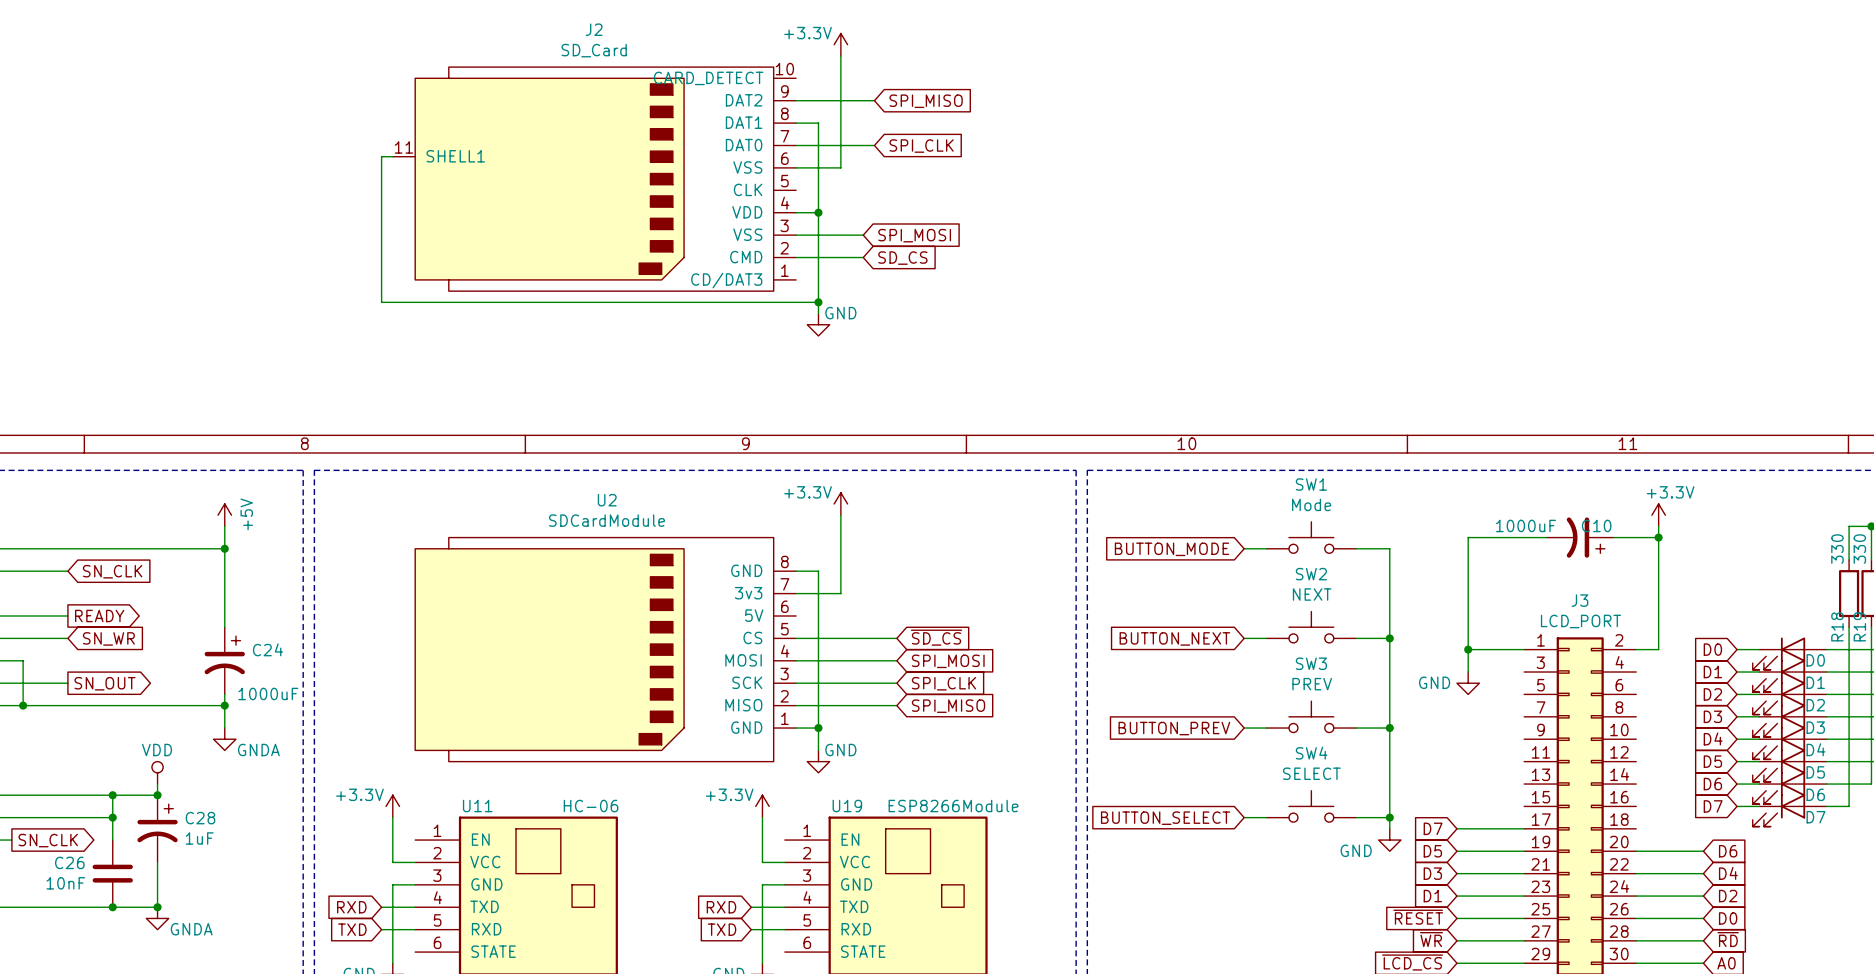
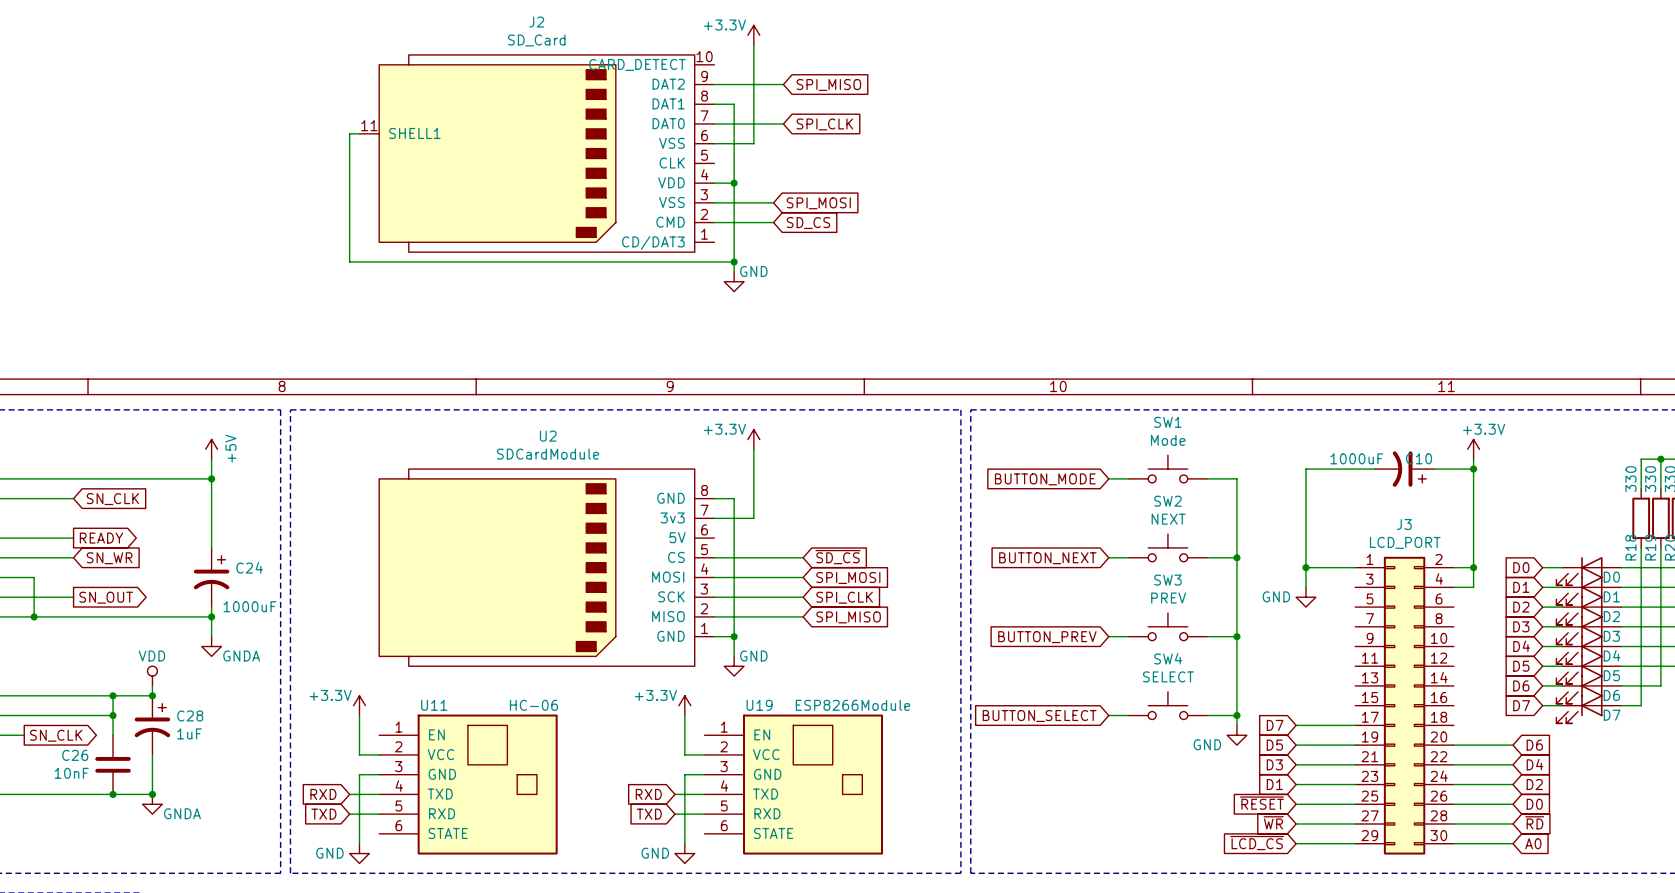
wire: none -> (1473, 567) (1473, 587) (1453, 587)
junction: none -> (1473, 567)

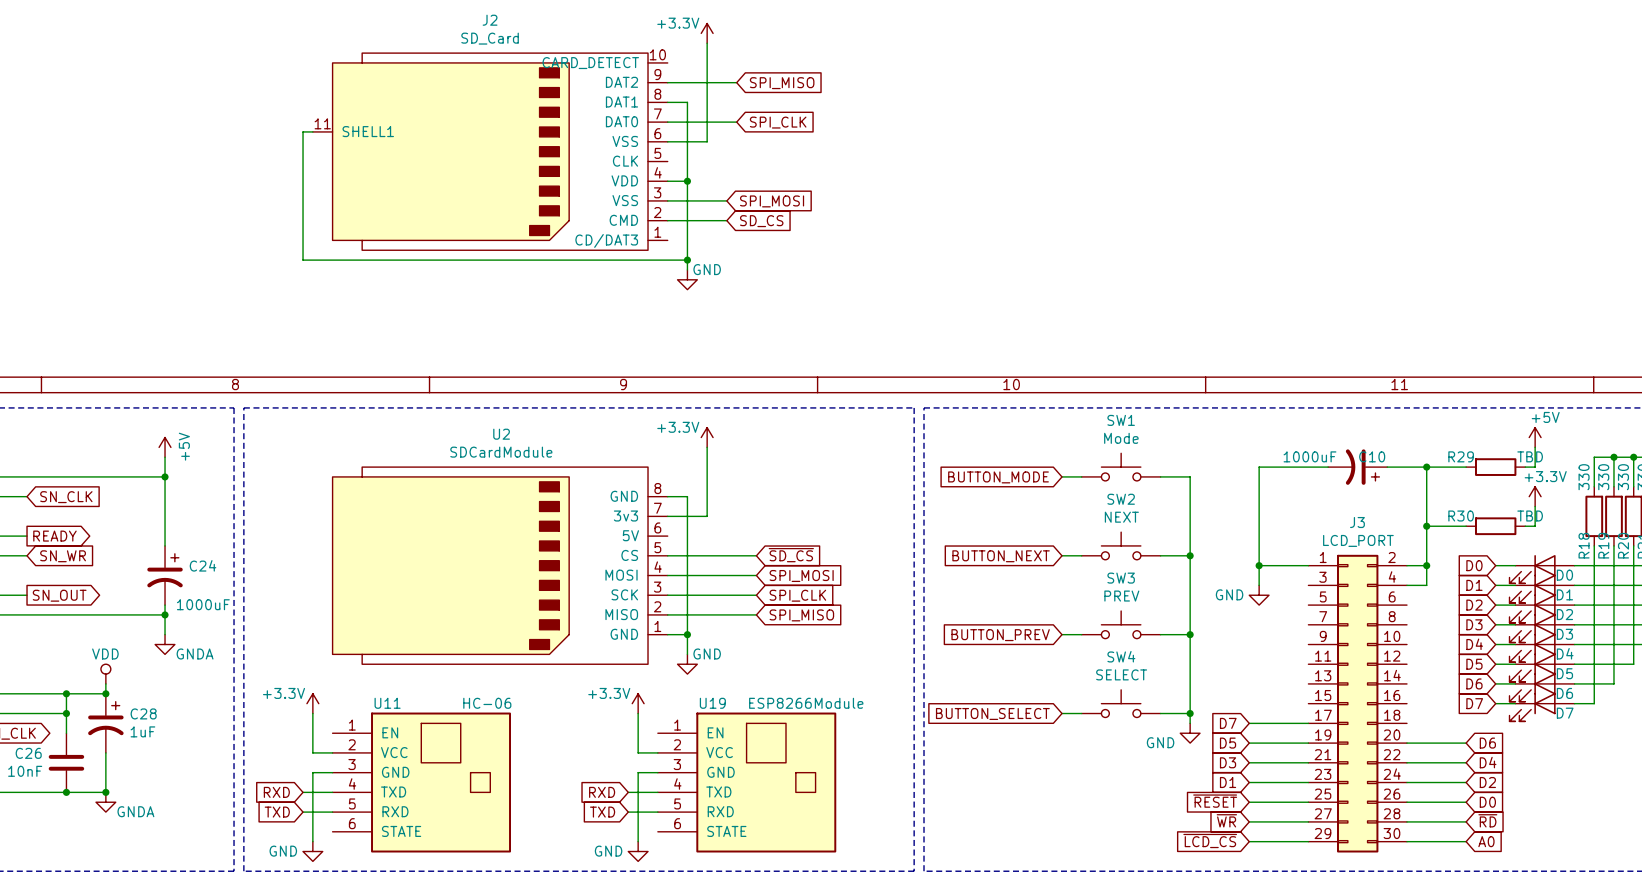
power symbol: none -> +5V (1535, 437)
power symbol position: +3.3V (1473, 449) -> +3.3V (1535, 496)
wire: none -> (1535, 447) (1535, 467) (1525, 467)
wire: (1473, 459) (1473, 469) -> (1466, 467) (1426, 467)
R29: none -> TBD (1495, 467)
wire: none -> (1535, 506) (1535, 526) (1525, 526)
wire: none -> (1426, 526) (1466, 526)
junction: none -> (1426, 526)
R30: none -> TBD (1495, 526)

